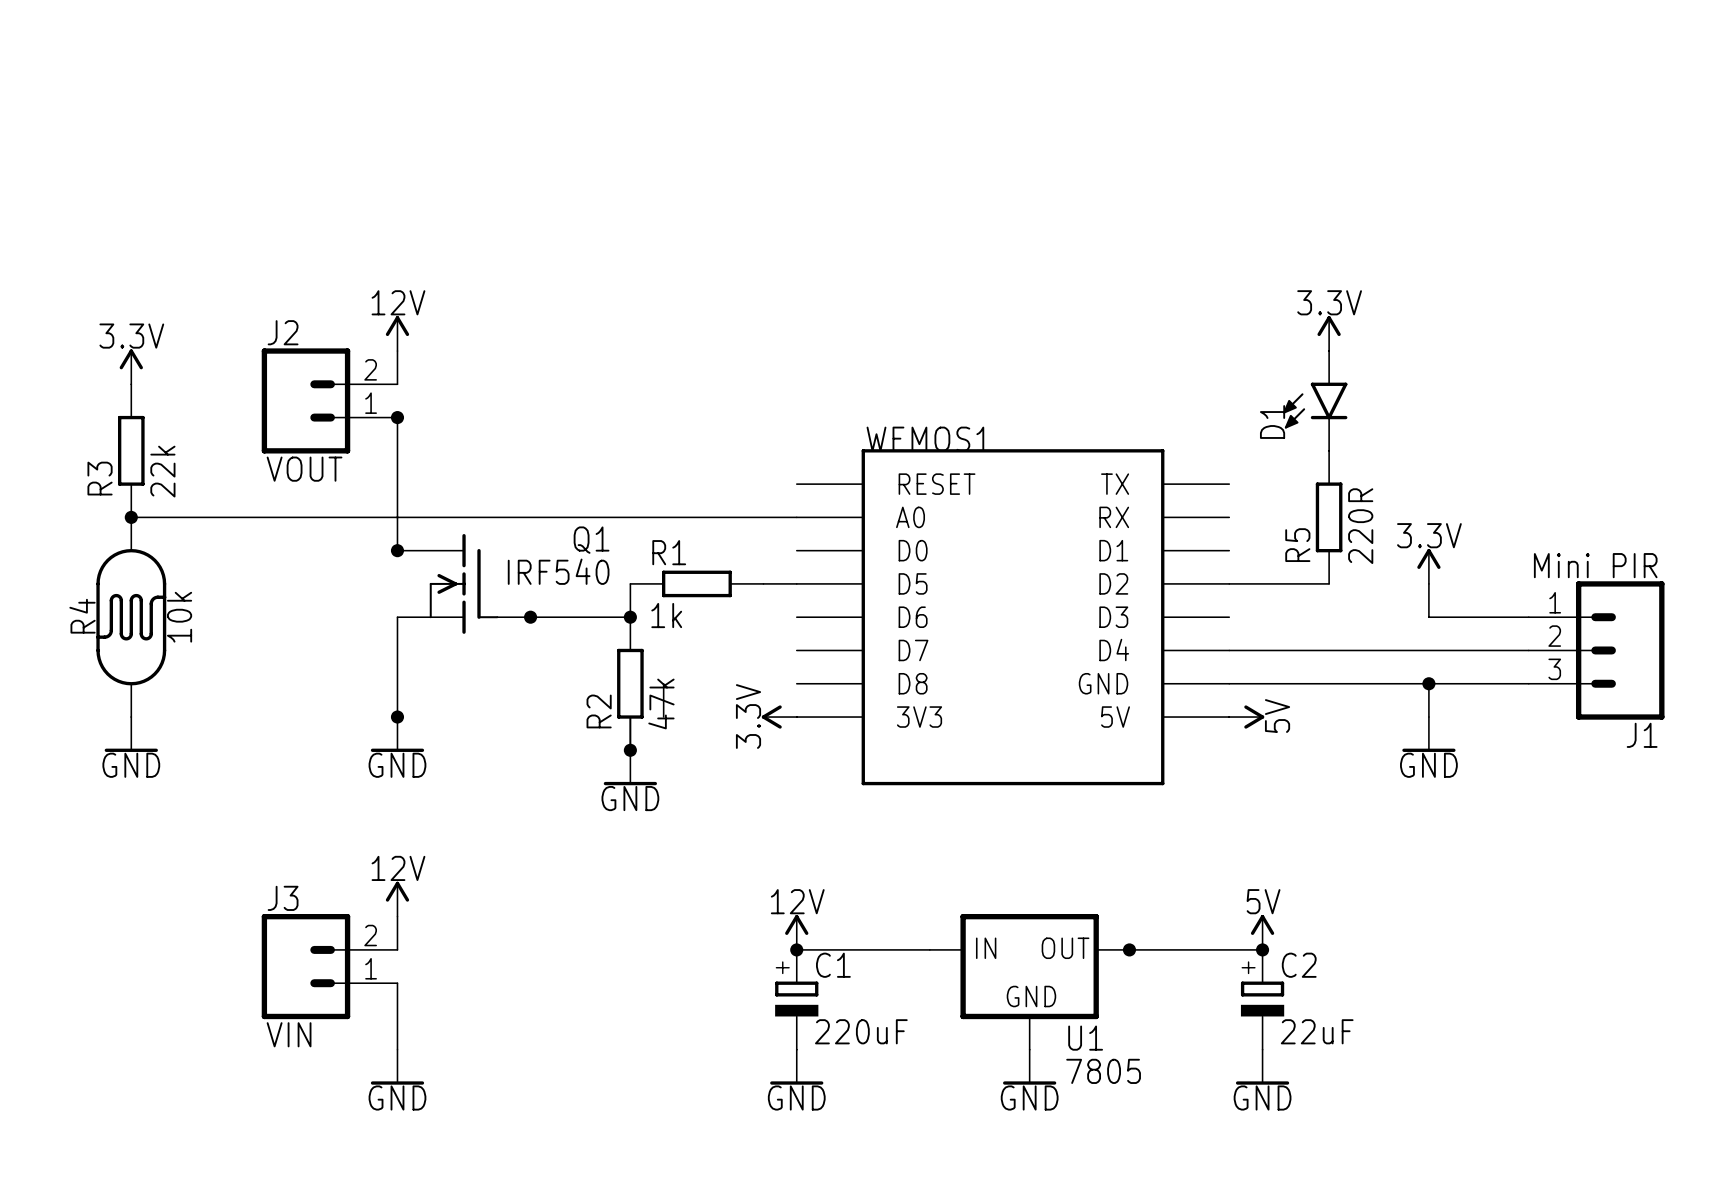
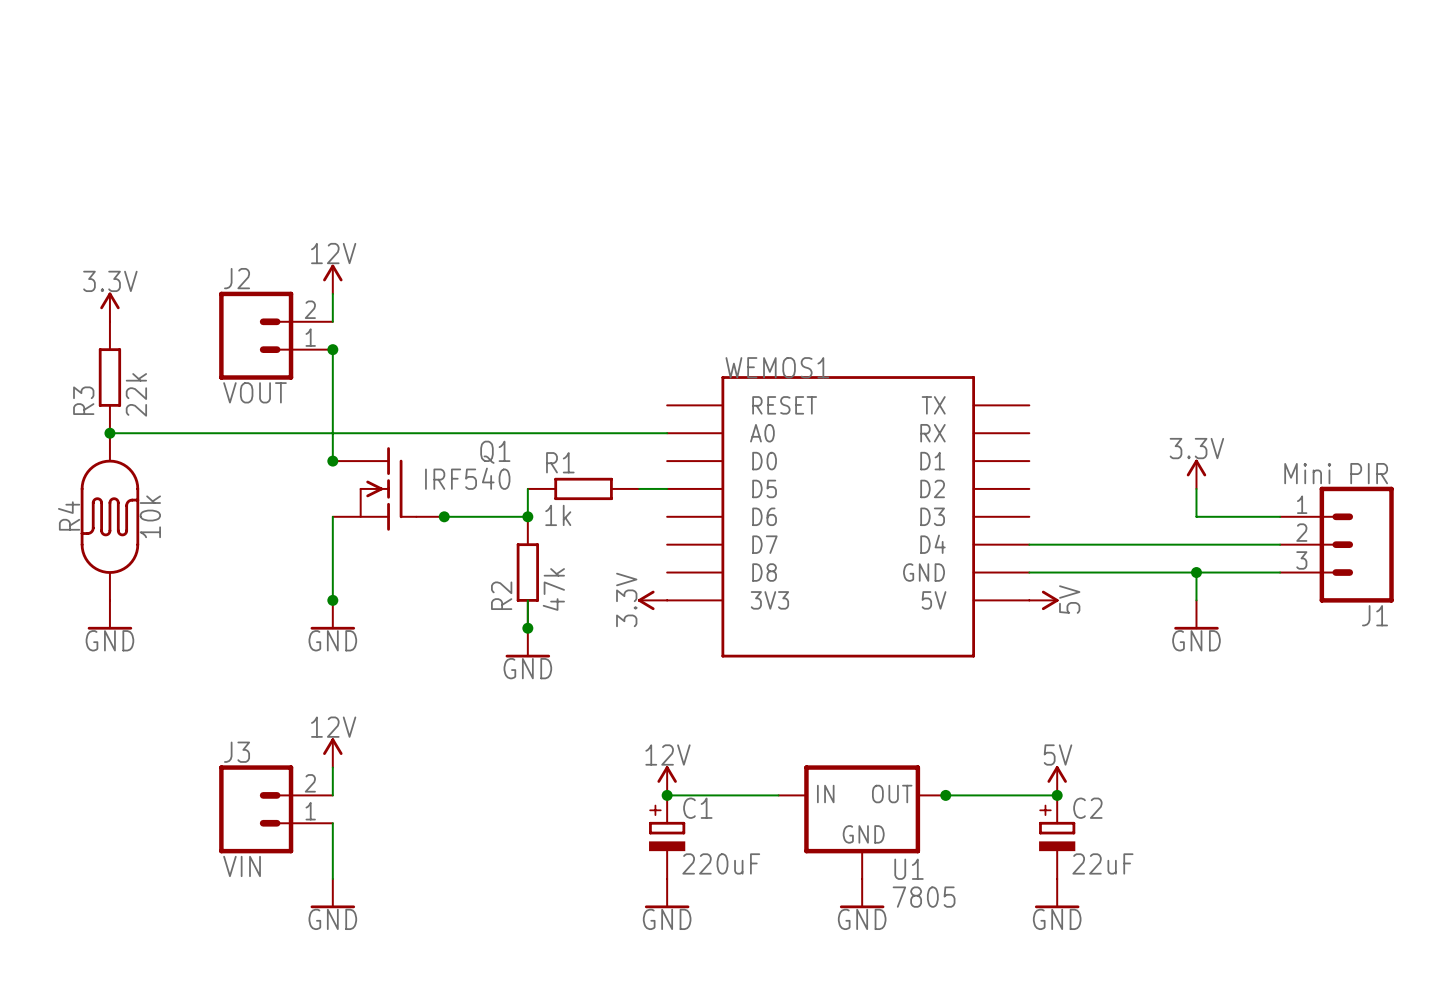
power symbol: 3.3V (1329, 333) -> none
D1: (1315, 400) -> none
R5: 220R (1329, 517) -> none
wire: (1229, 583) (1329, 583) -> none
wire: (663, 683) (663, 717) -> none

